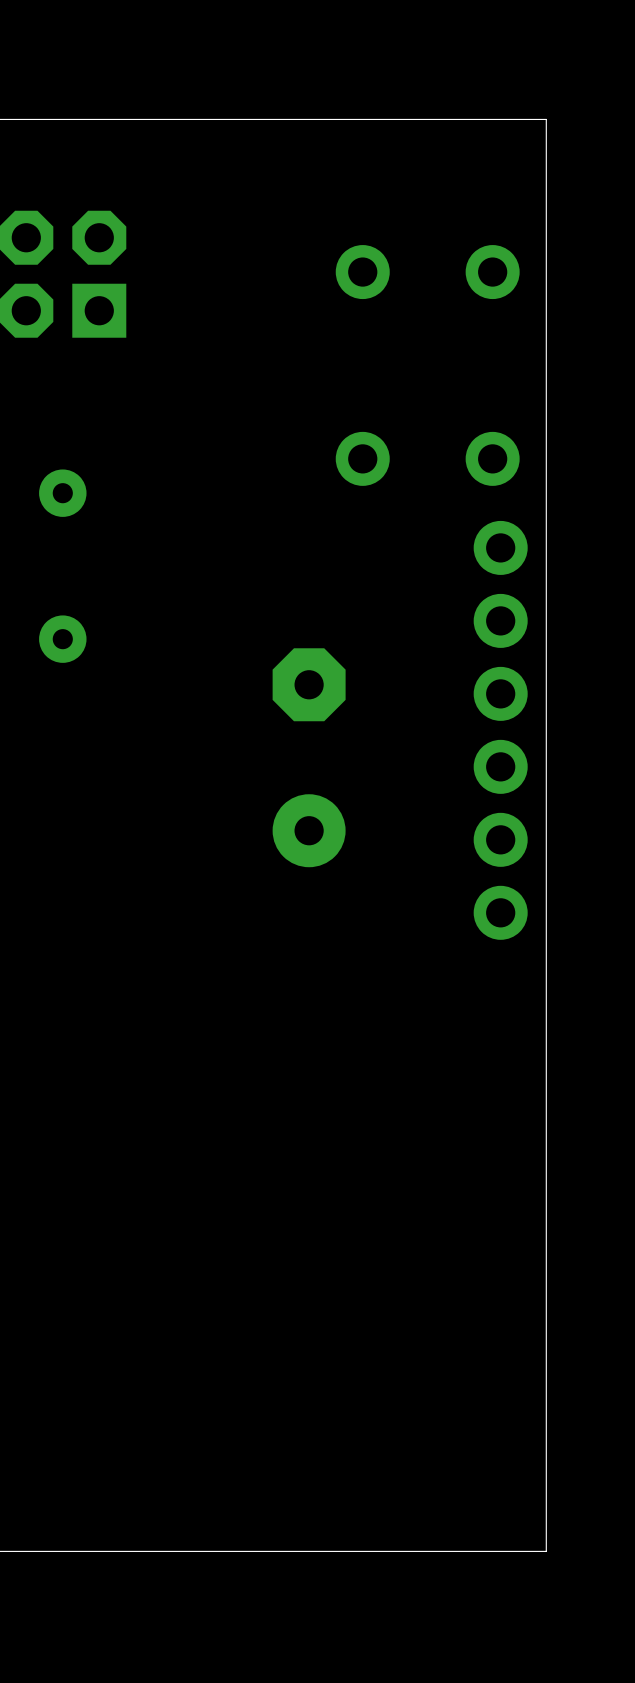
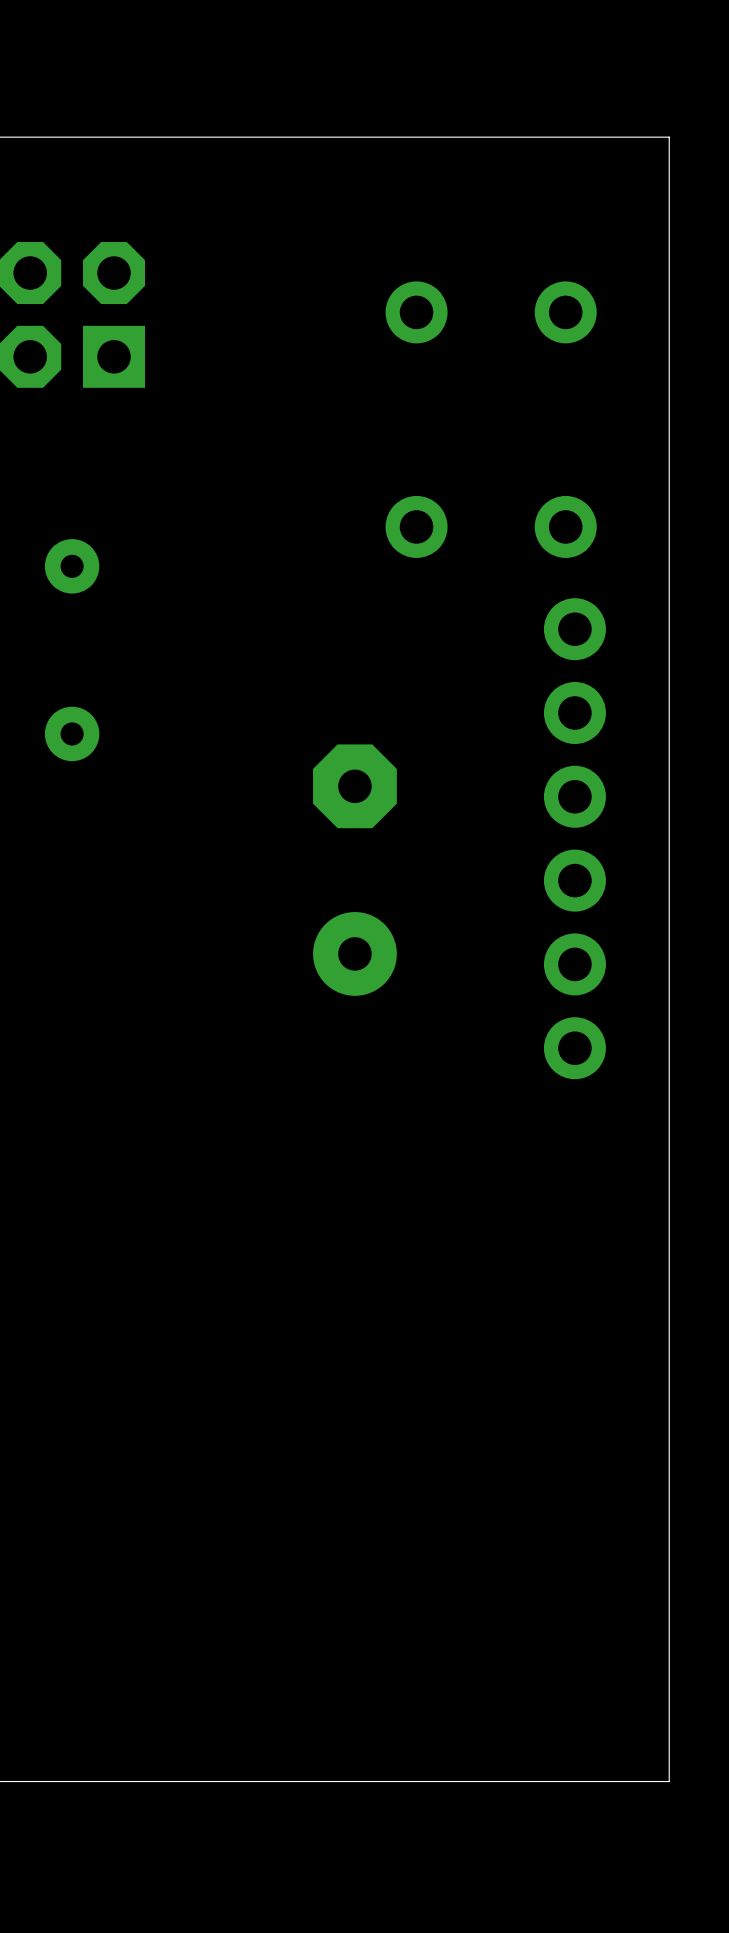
board edge: (546, 119) (546, 1551) -> (627, 137) (669, 137) (669, 1781) (627, 1781)

